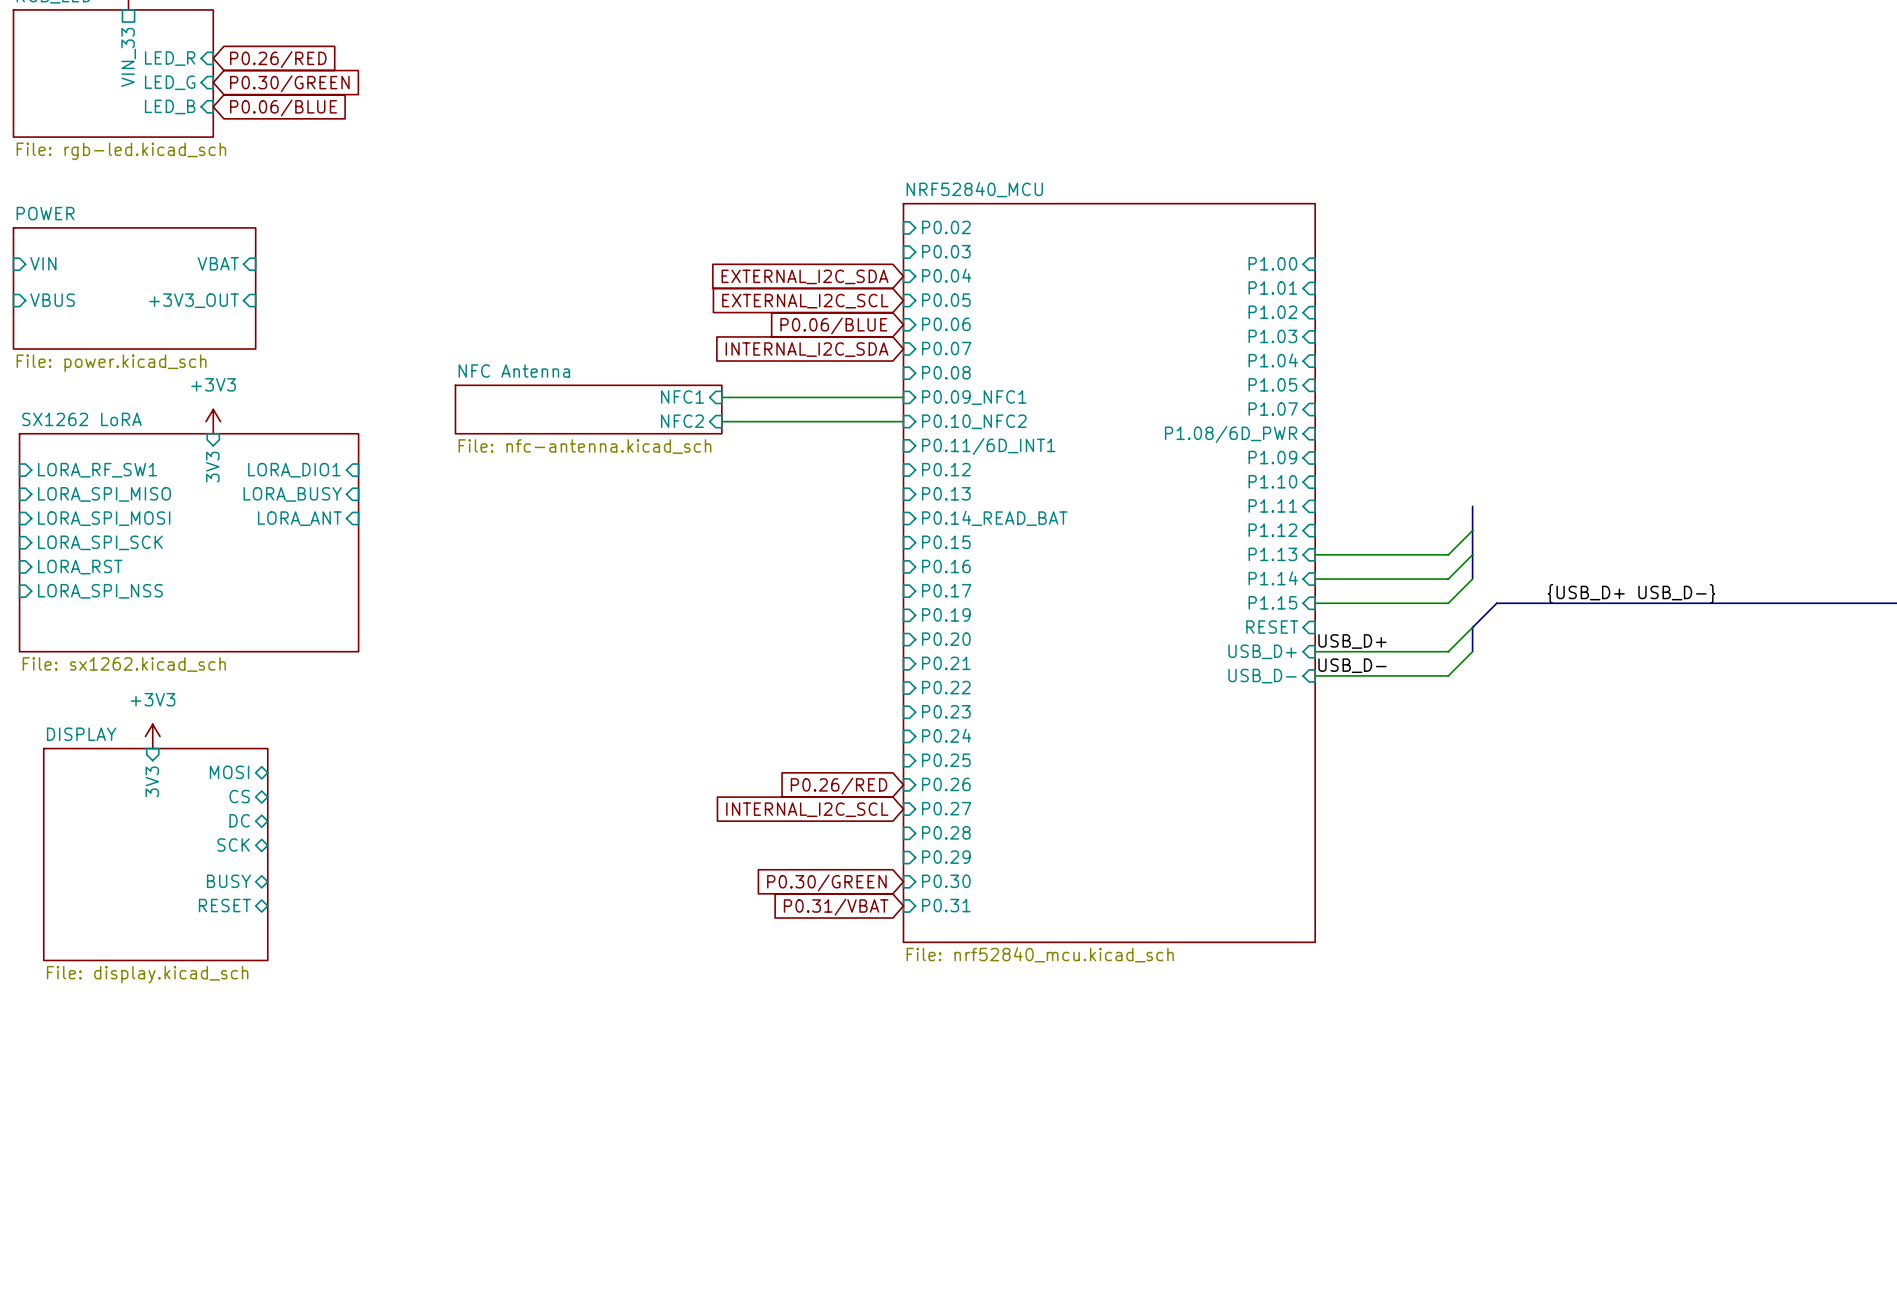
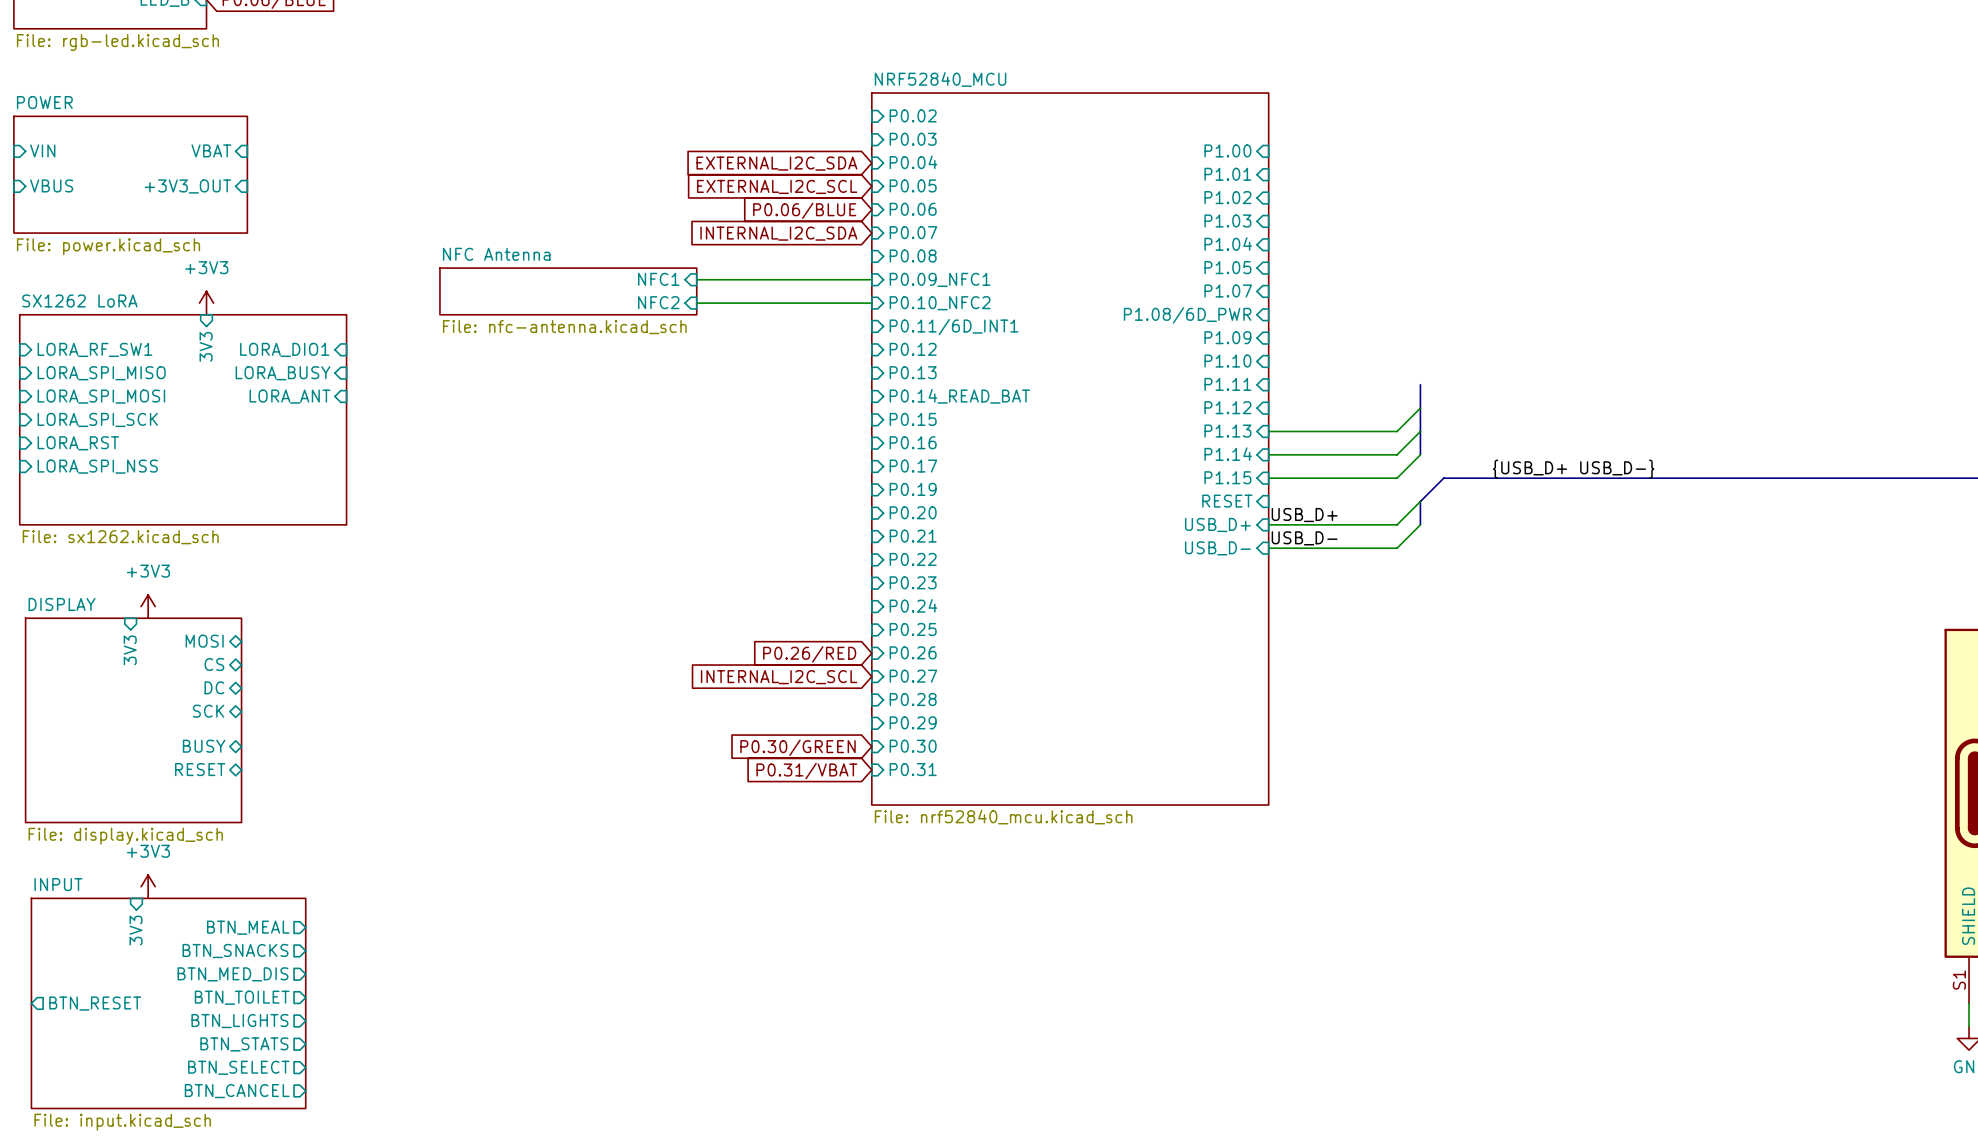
sheet pin position: MOSI (229, 772) -> MOSI (204, 641)
sheet pin position: 3V3 (152, 781) -> 3V3 (130, 650)
sheet pin position: CS (239, 796) -> CS (214, 664)
sheet pin position: DC (239, 820) -> DC (214, 687)
sheet pin position: SCK (233, 844) -> SCK (208, 711)
sheet DISPLAY position: (155, 854) -> (133, 720)
sheet pin position: BUSY (228, 881) -> BUSY (204, 746)
sheet pin position: RESET (224, 905) -> RESET (200, 769)
power symbol: none -> +3V3 (148, 886)
sheet pin: none -> BTN_MEAL (248, 927)
sheet pin: none -> 3V3 (136, 930)
sheet pin: none -> BTN_SNACKS (235, 951)
sheet pin: none -> BTN_MED_DIS (233, 974)
sheet pin: none -> BTN_TOILET (242, 997)
sheet pin: none -> BTN_RESET (95, 1003)
sheet INPUT: none -> File: input.kicad_sch (168, 1003)
sheet pin: none -> BTN_LIGHTS (239, 1021)
sheet pin: none -> BTN_STATS (244, 1044)
sheet pin: none -> BTN_SELECT (238, 1067)
sheet pin: none -> BTN_CANCEL (237, 1091)

